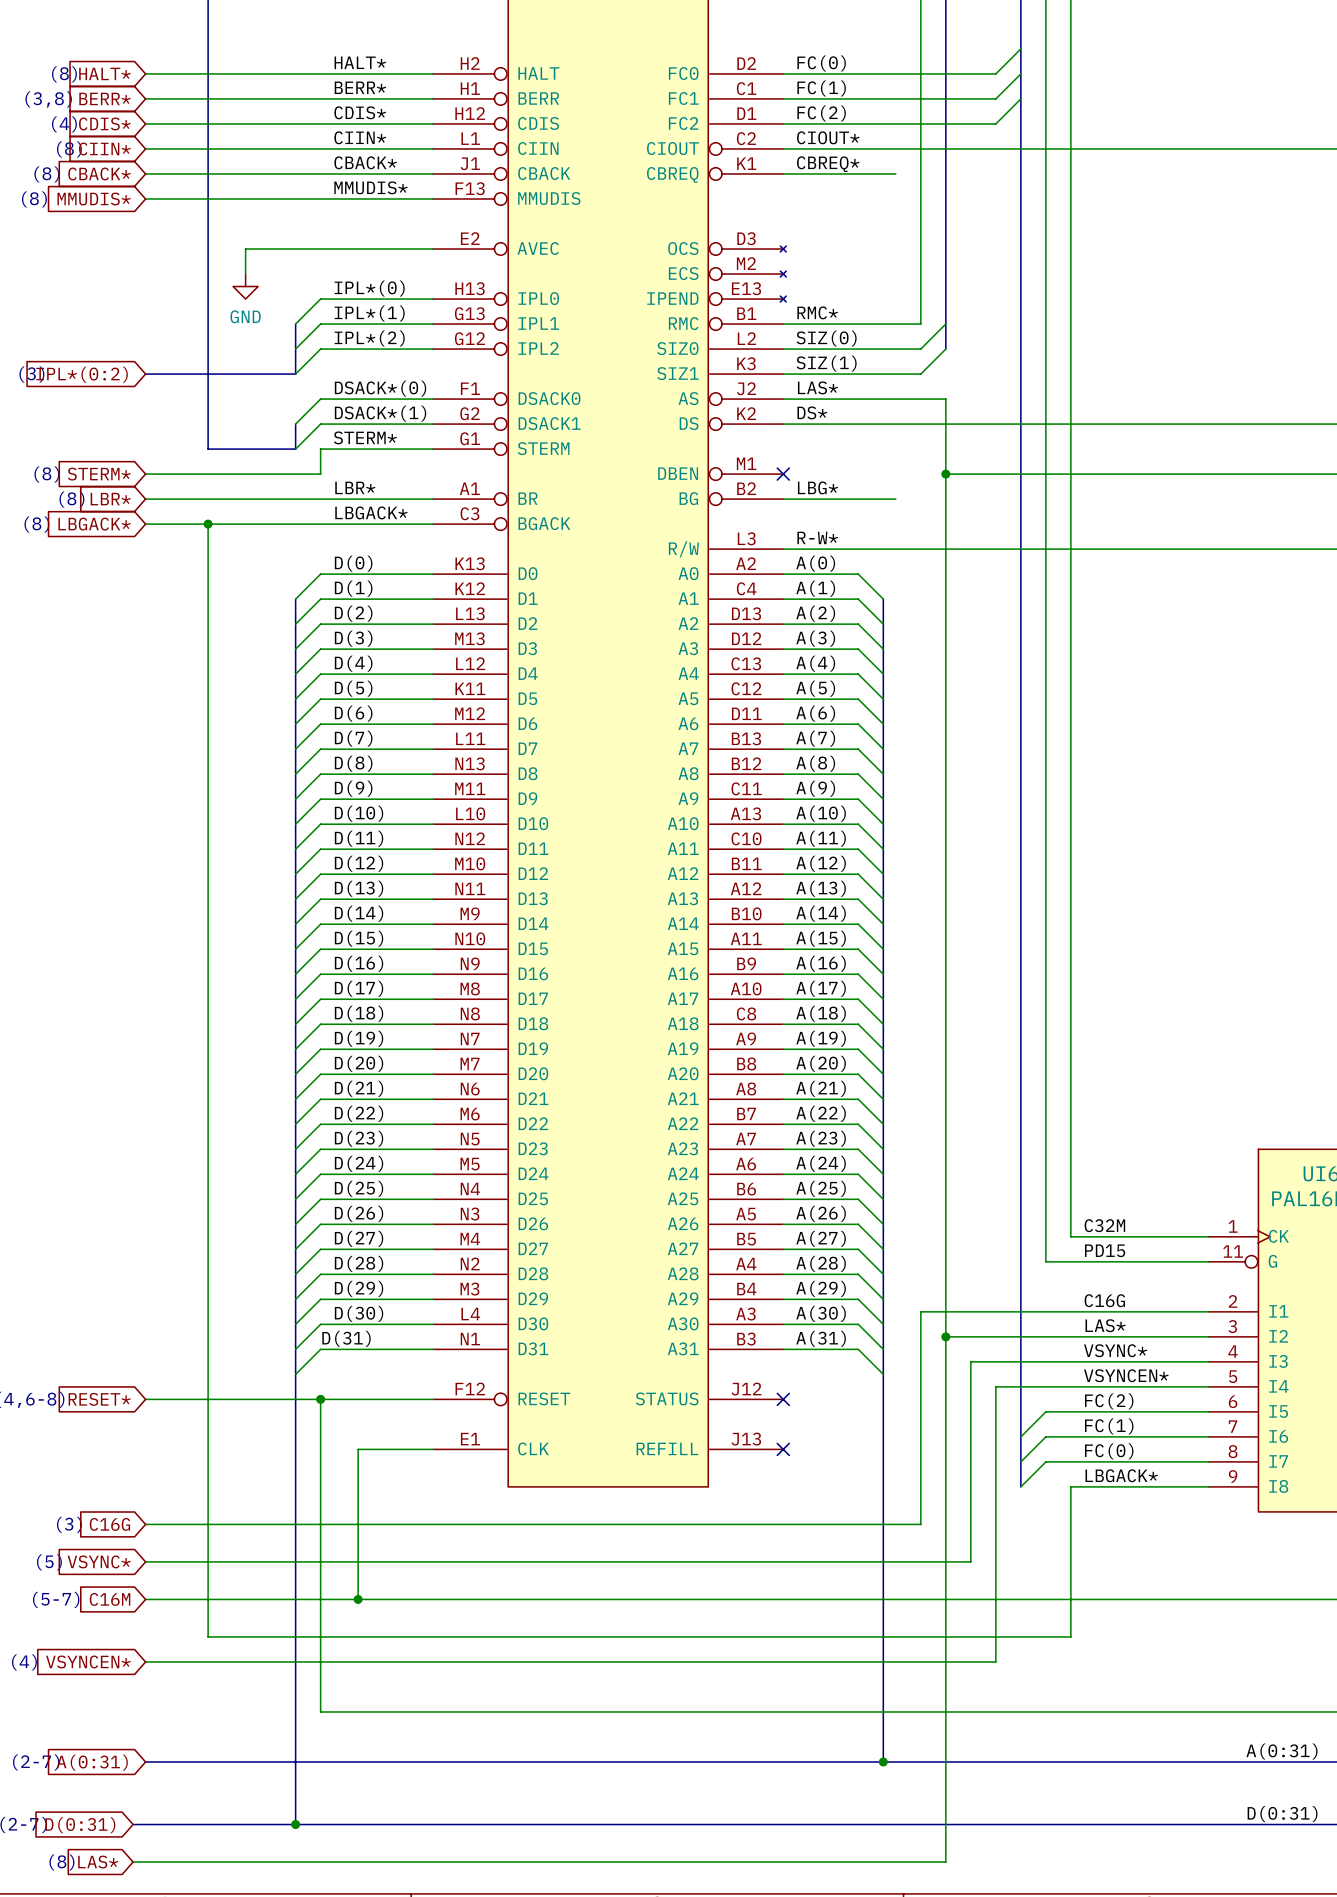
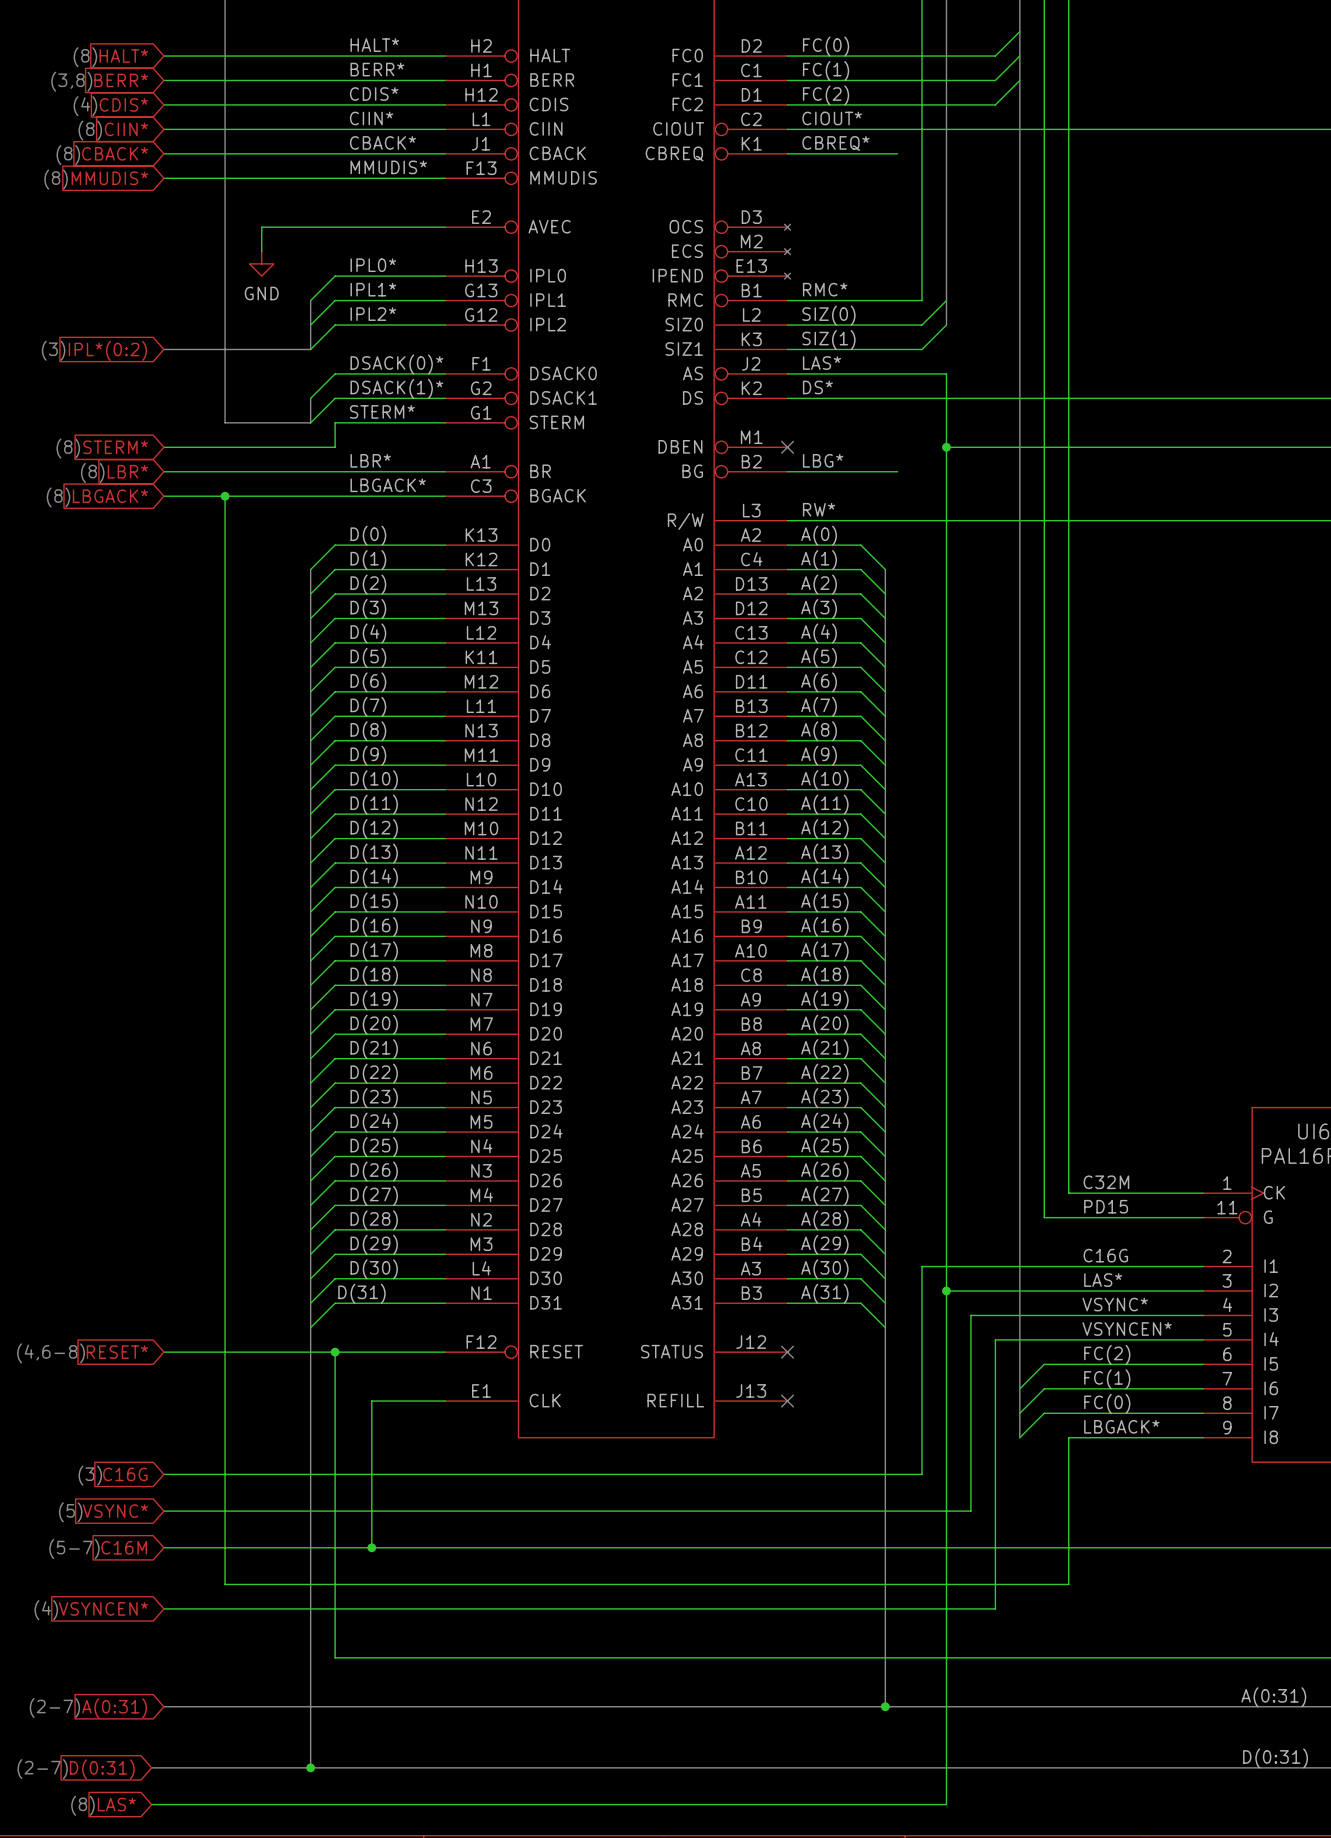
label: IPL*(0) (369, 288) -> IPL0* (373, 265)
label: IPL*(1) (369, 313) -> IPL1* (373, 289)
label: IPL*(2) (369, 338) -> IPL2* (373, 314)
label: DSACK*(0) (380, 388) -> DSACK(0)* (396, 364)
label: DSACK*(1) (380, 413) -> DSACK(1)* (396, 388)
label: R-W* (817, 537) -> RW* (819, 509)

